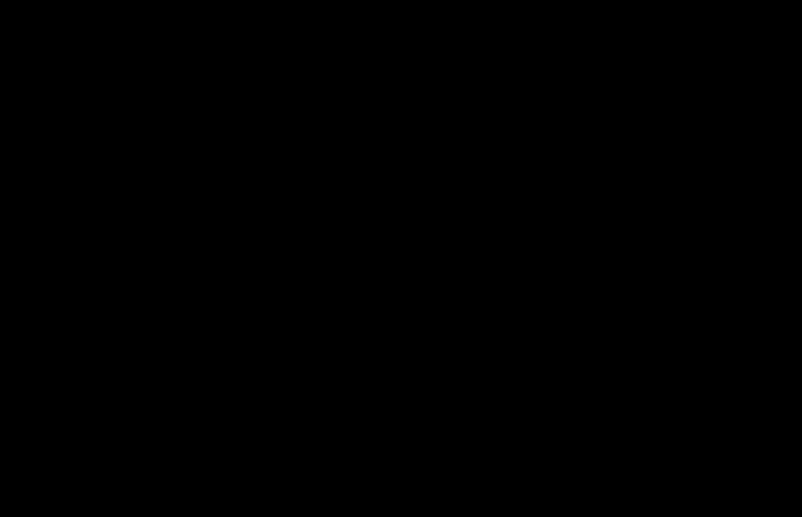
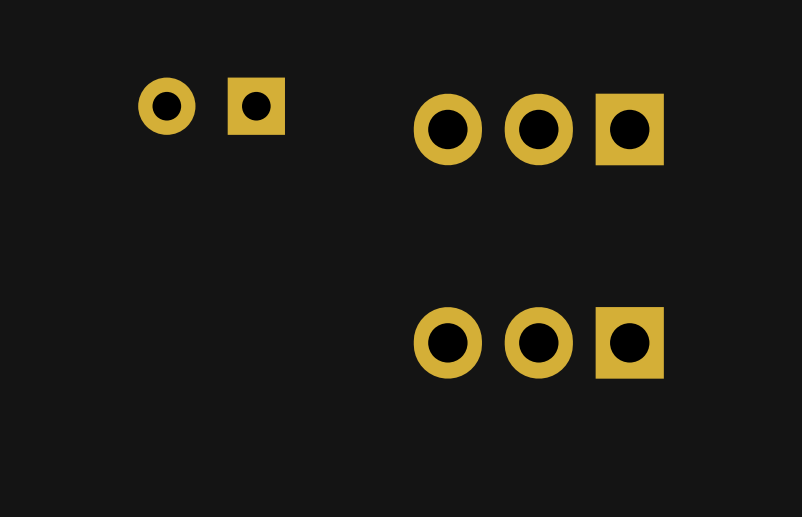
part: none -> (211, 106)
part: none -> (538, 129)
part: none -> (538, 342)

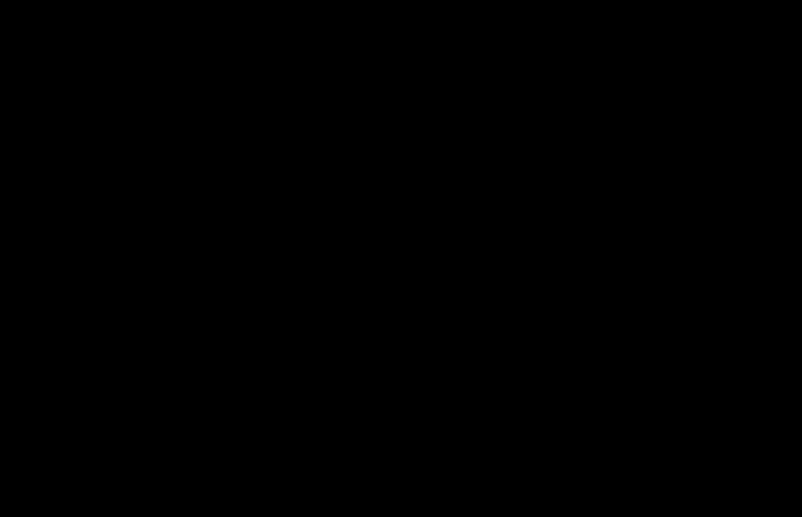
part: (211, 106) -> none
part: (538, 129) -> none
part: (538, 342) -> none

